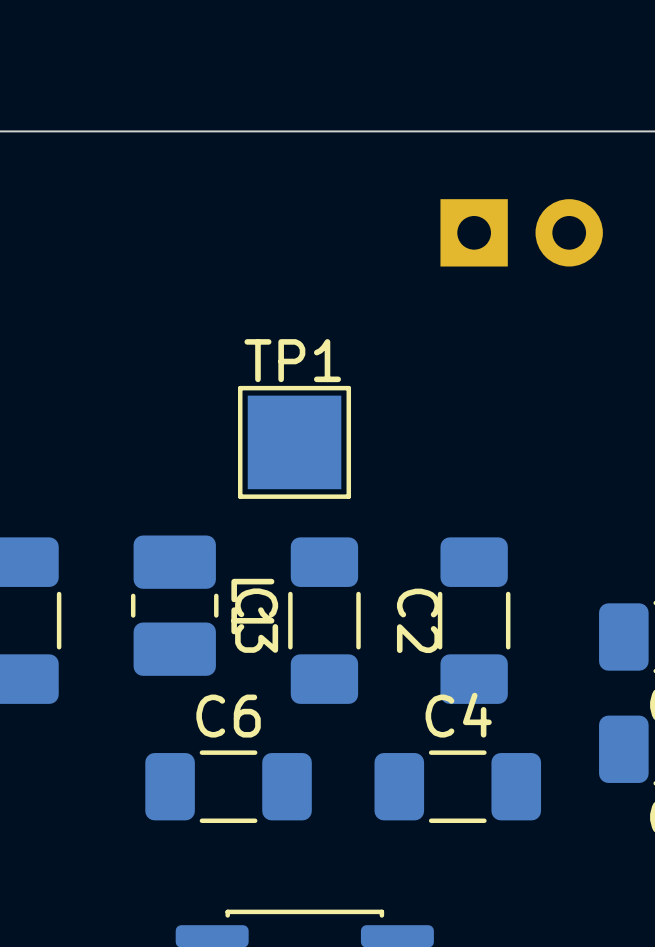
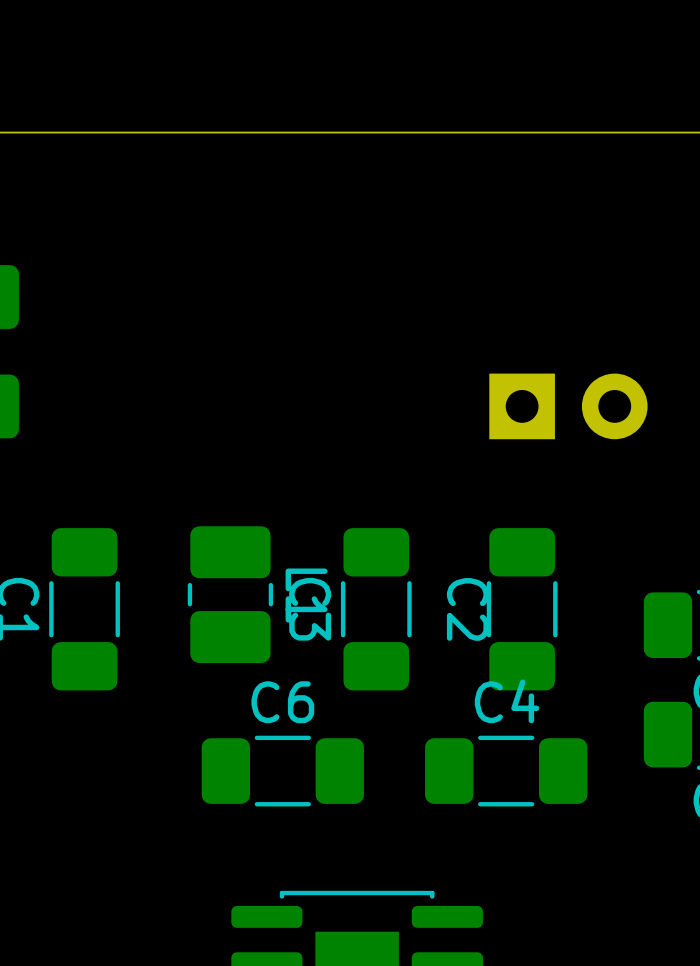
part position: (521, 232) -> (568, 406)
TP1: (294, 442) -> none

